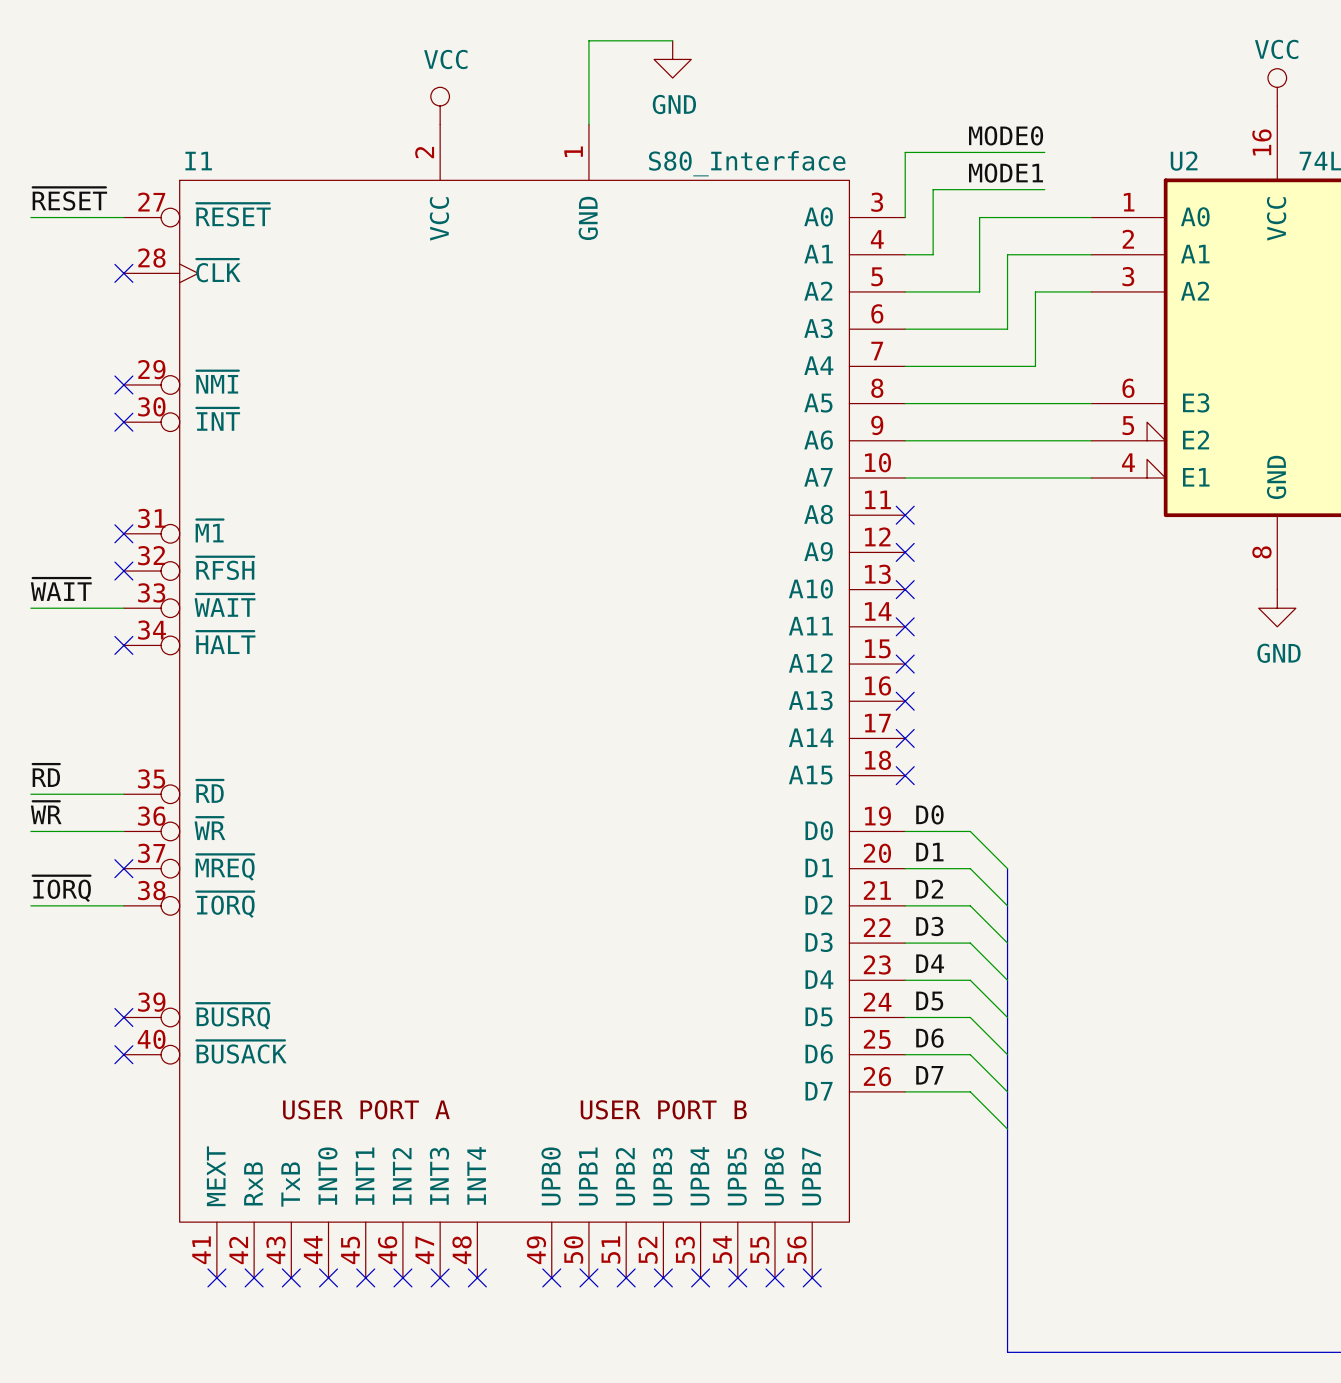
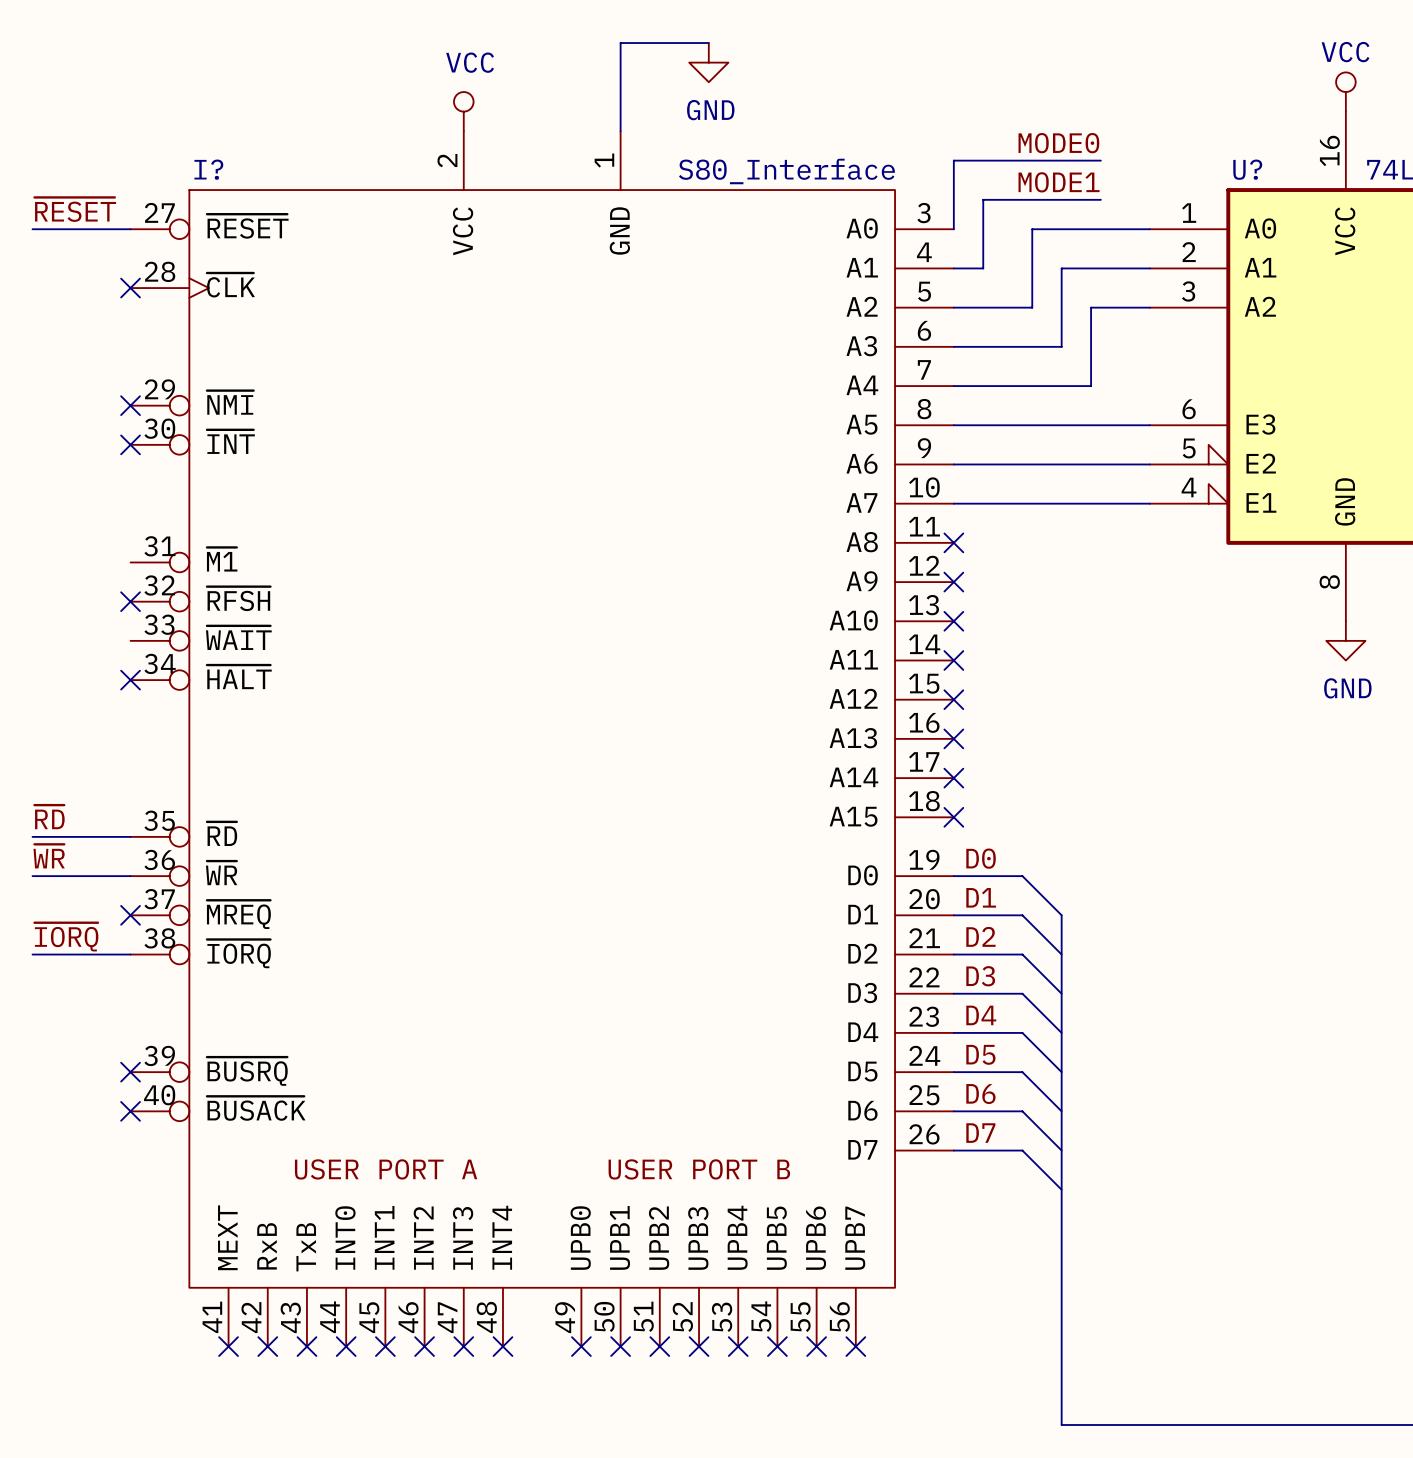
I1 name: I1 (198, 161) -> I? (208, 169)
U2 name: U2 (1184, 161) -> U? (1247, 169)
no-connect mark: (123, 533) -> none
label: ~{WAIT} (61, 589) -> none
wire: (30, 608) (123, 608) -> none

